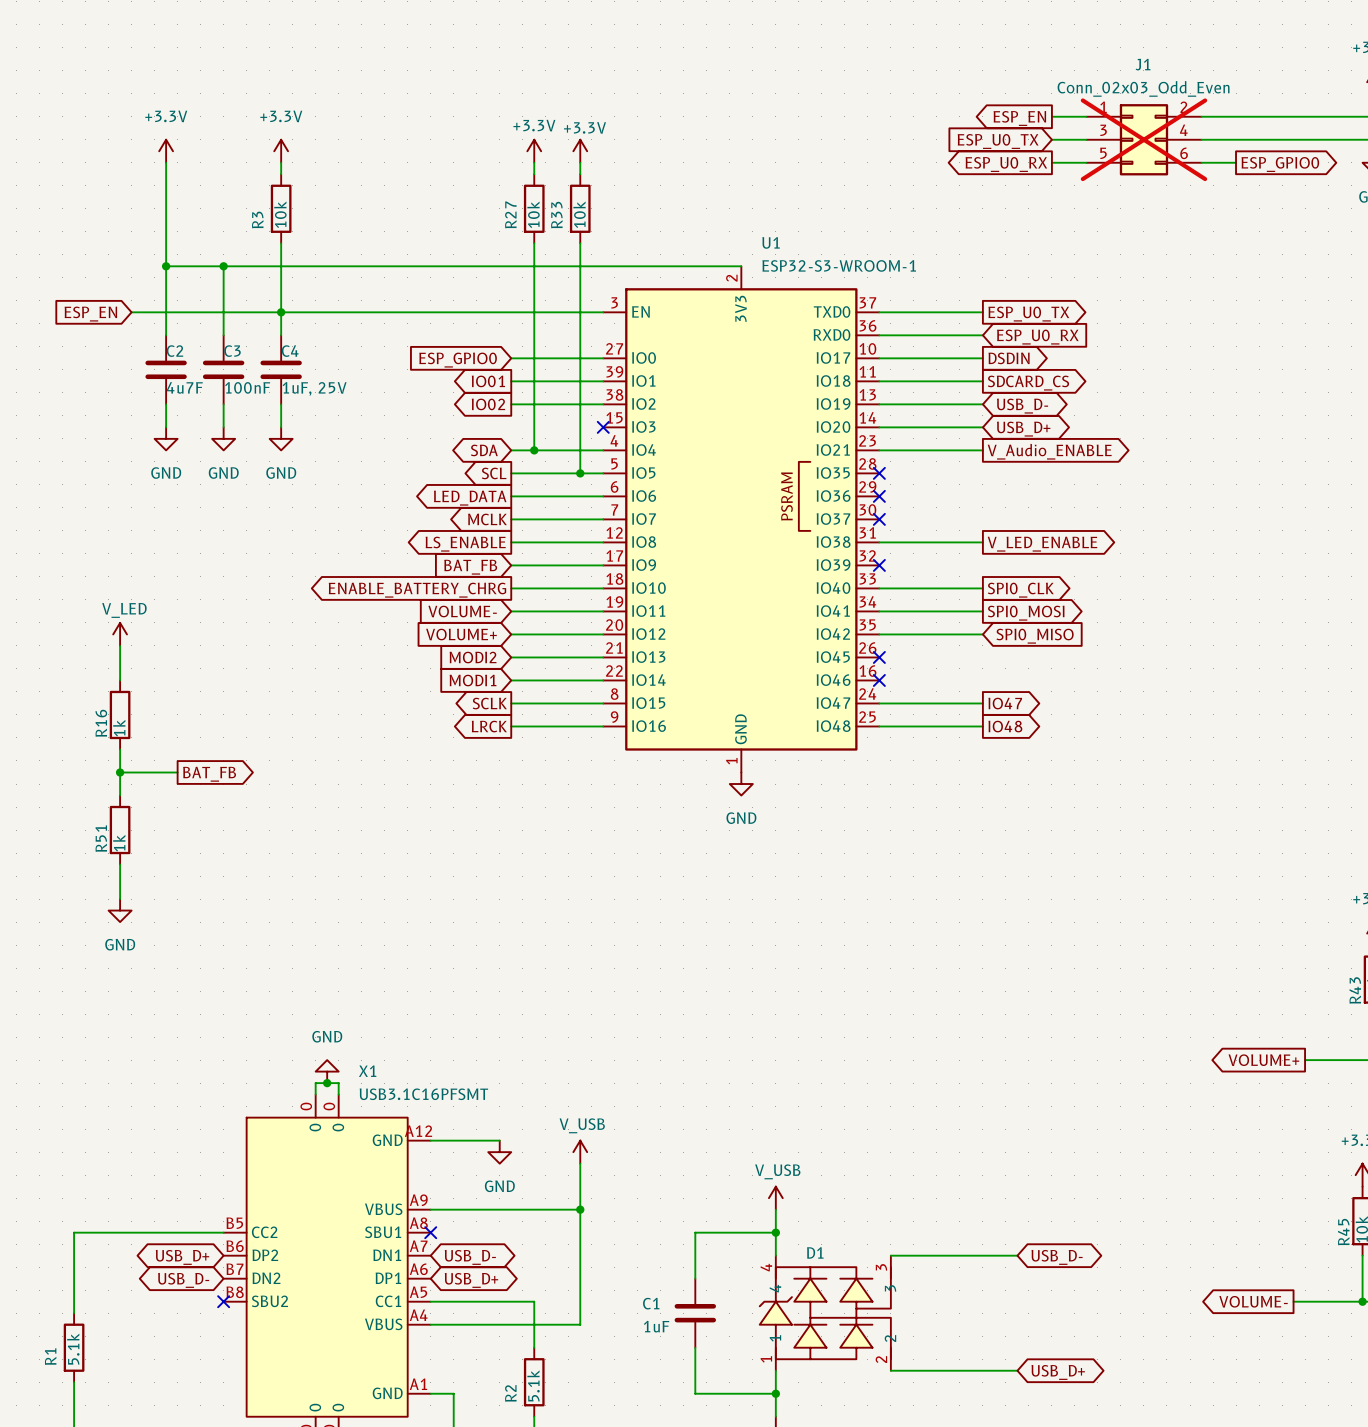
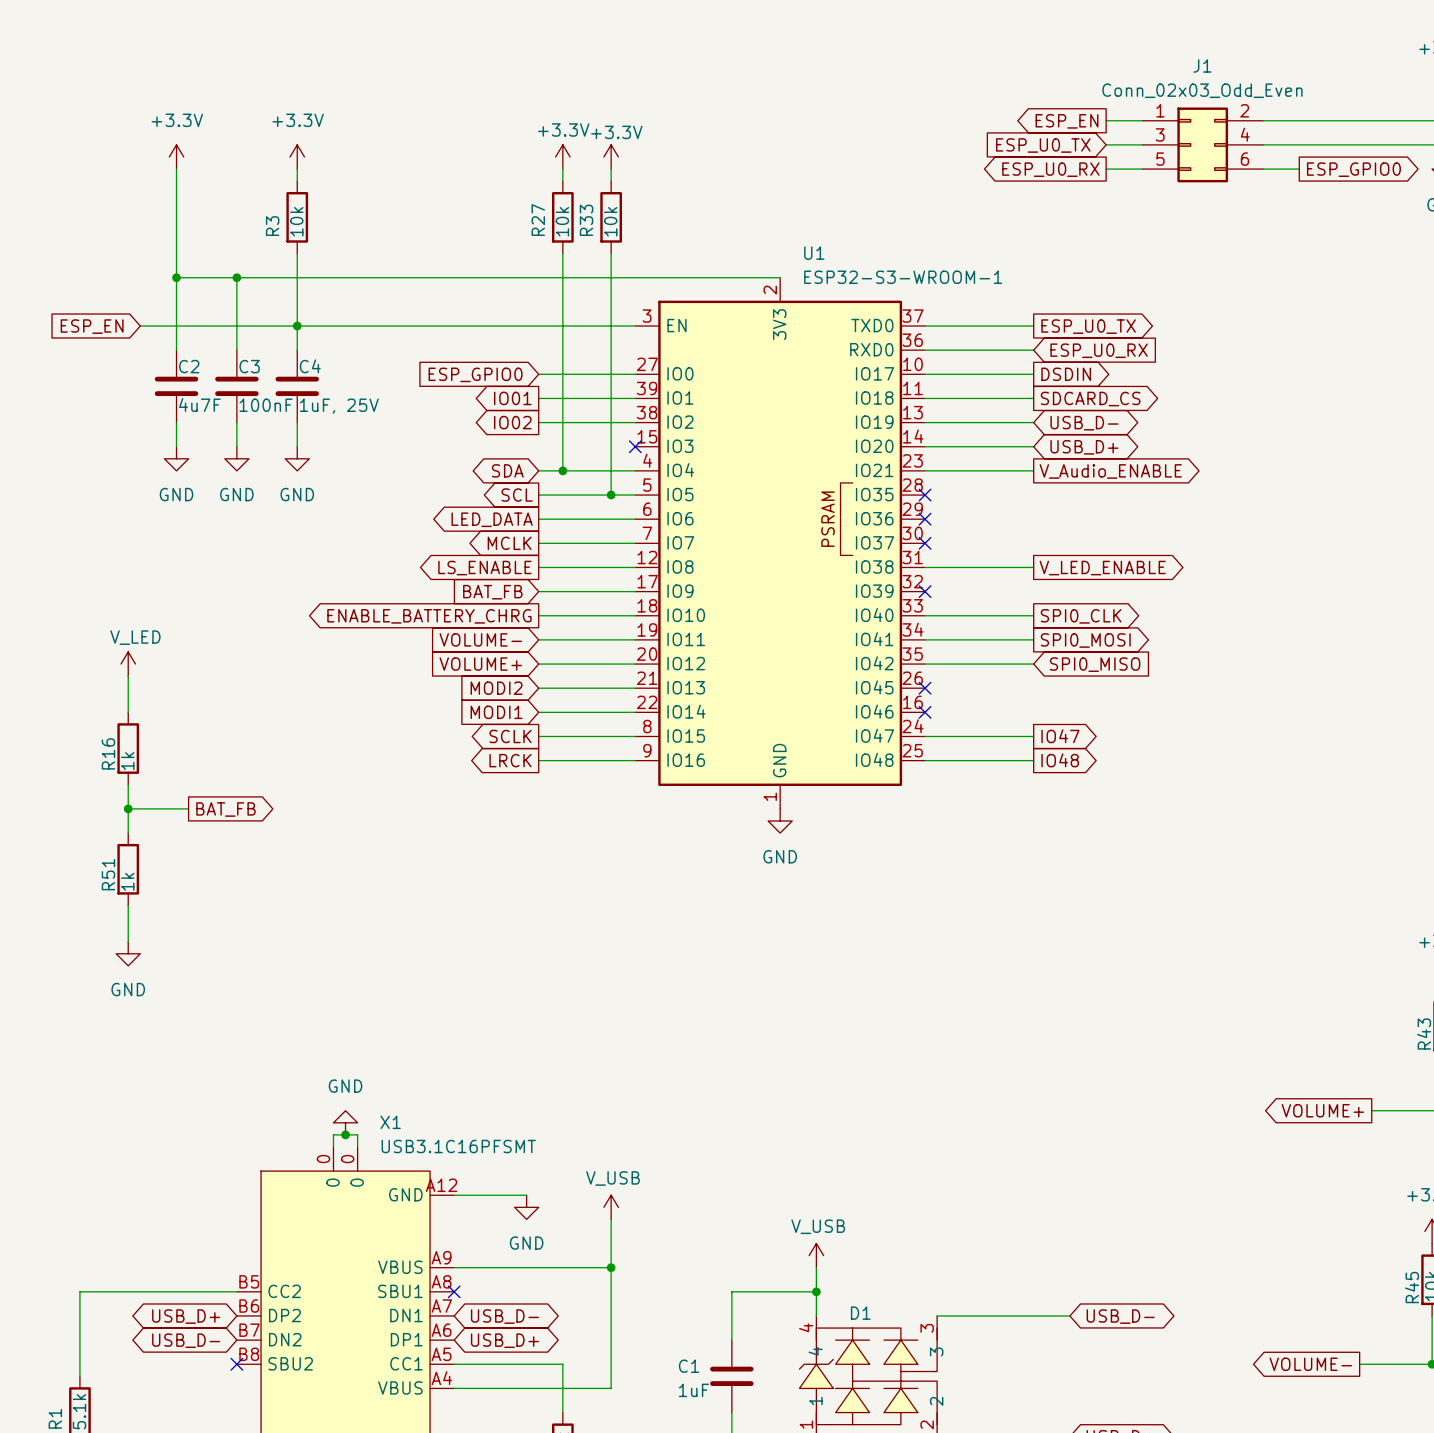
J1 do-not-place cross: (1143, 139) -> none

